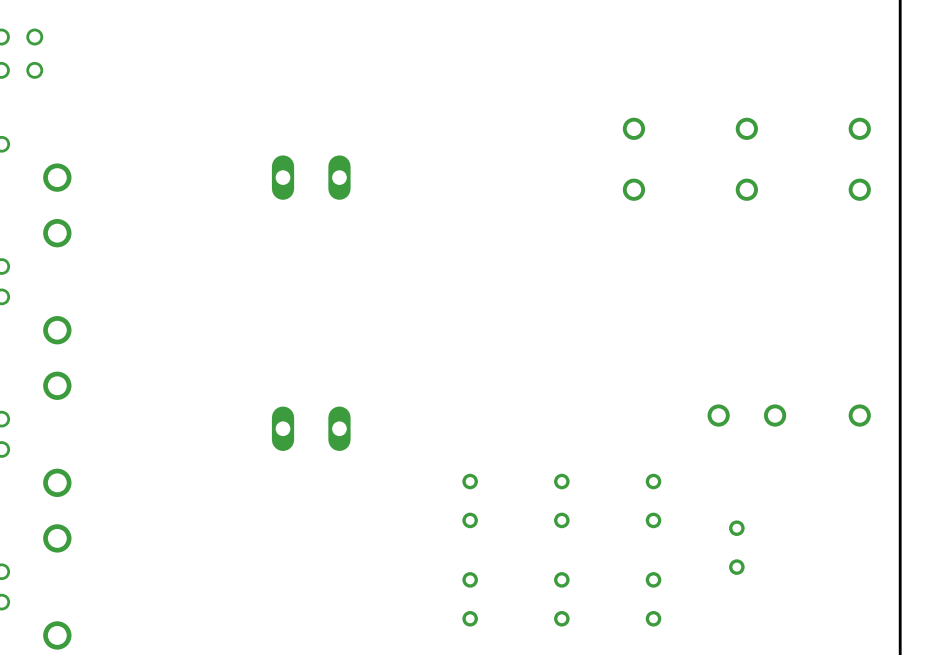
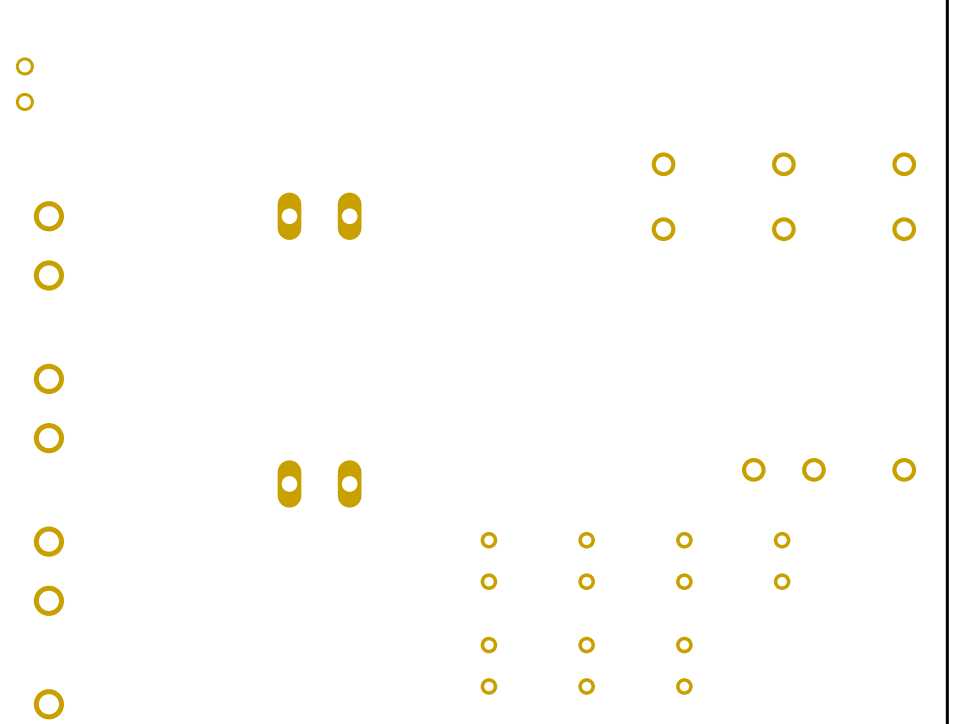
part position: (736, 547) -> (782, 560)

